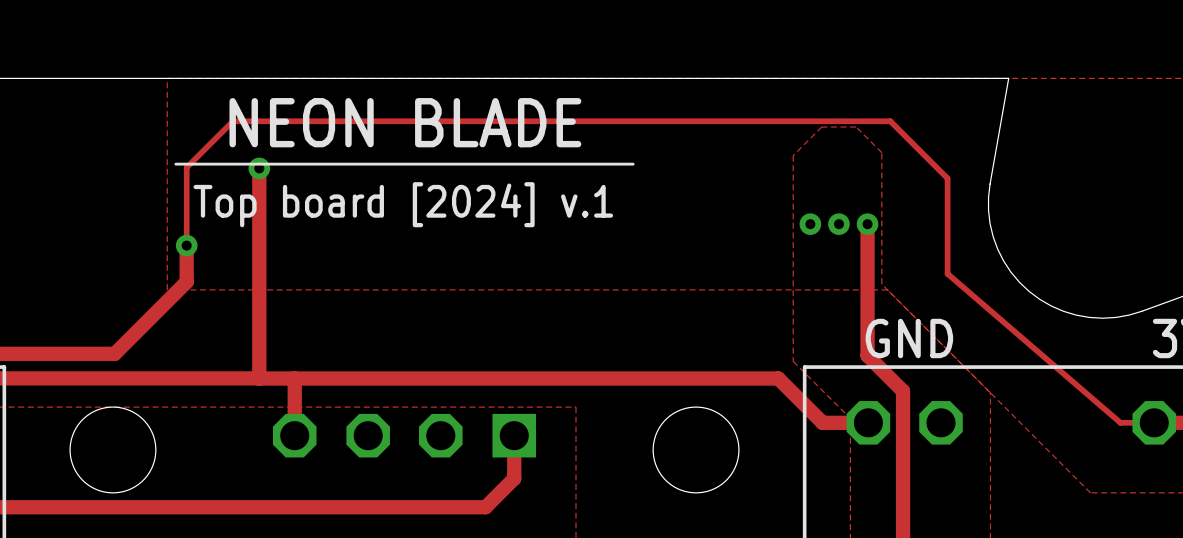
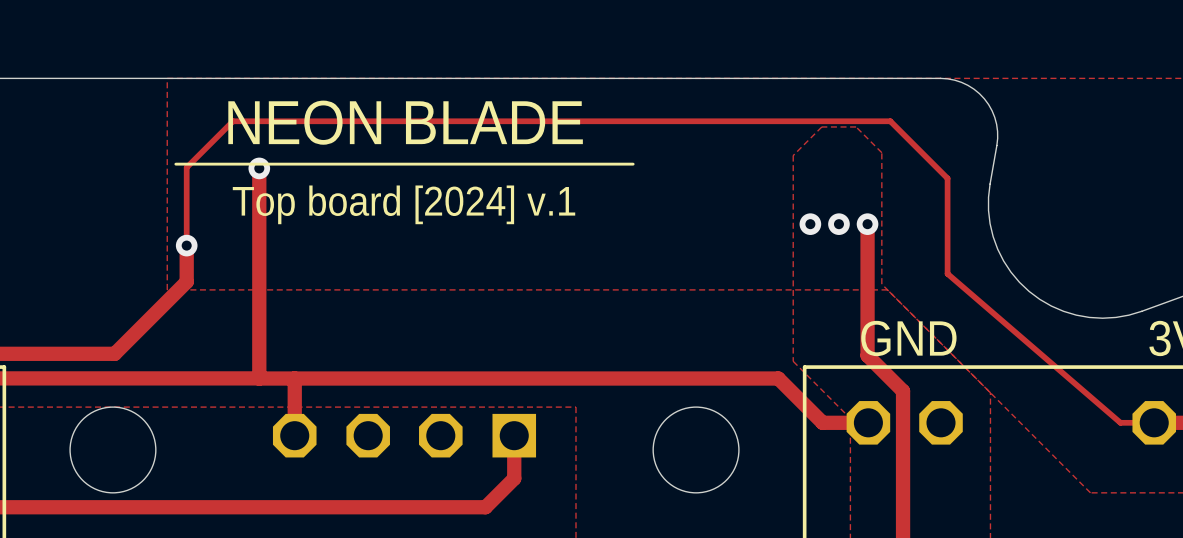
board edge: (940, 78) (1008, 78) (996, 145) -> (940, 78) (954, 80) (967, 85) (984, 98) (994, 117) (997, 131) (996, 145)

